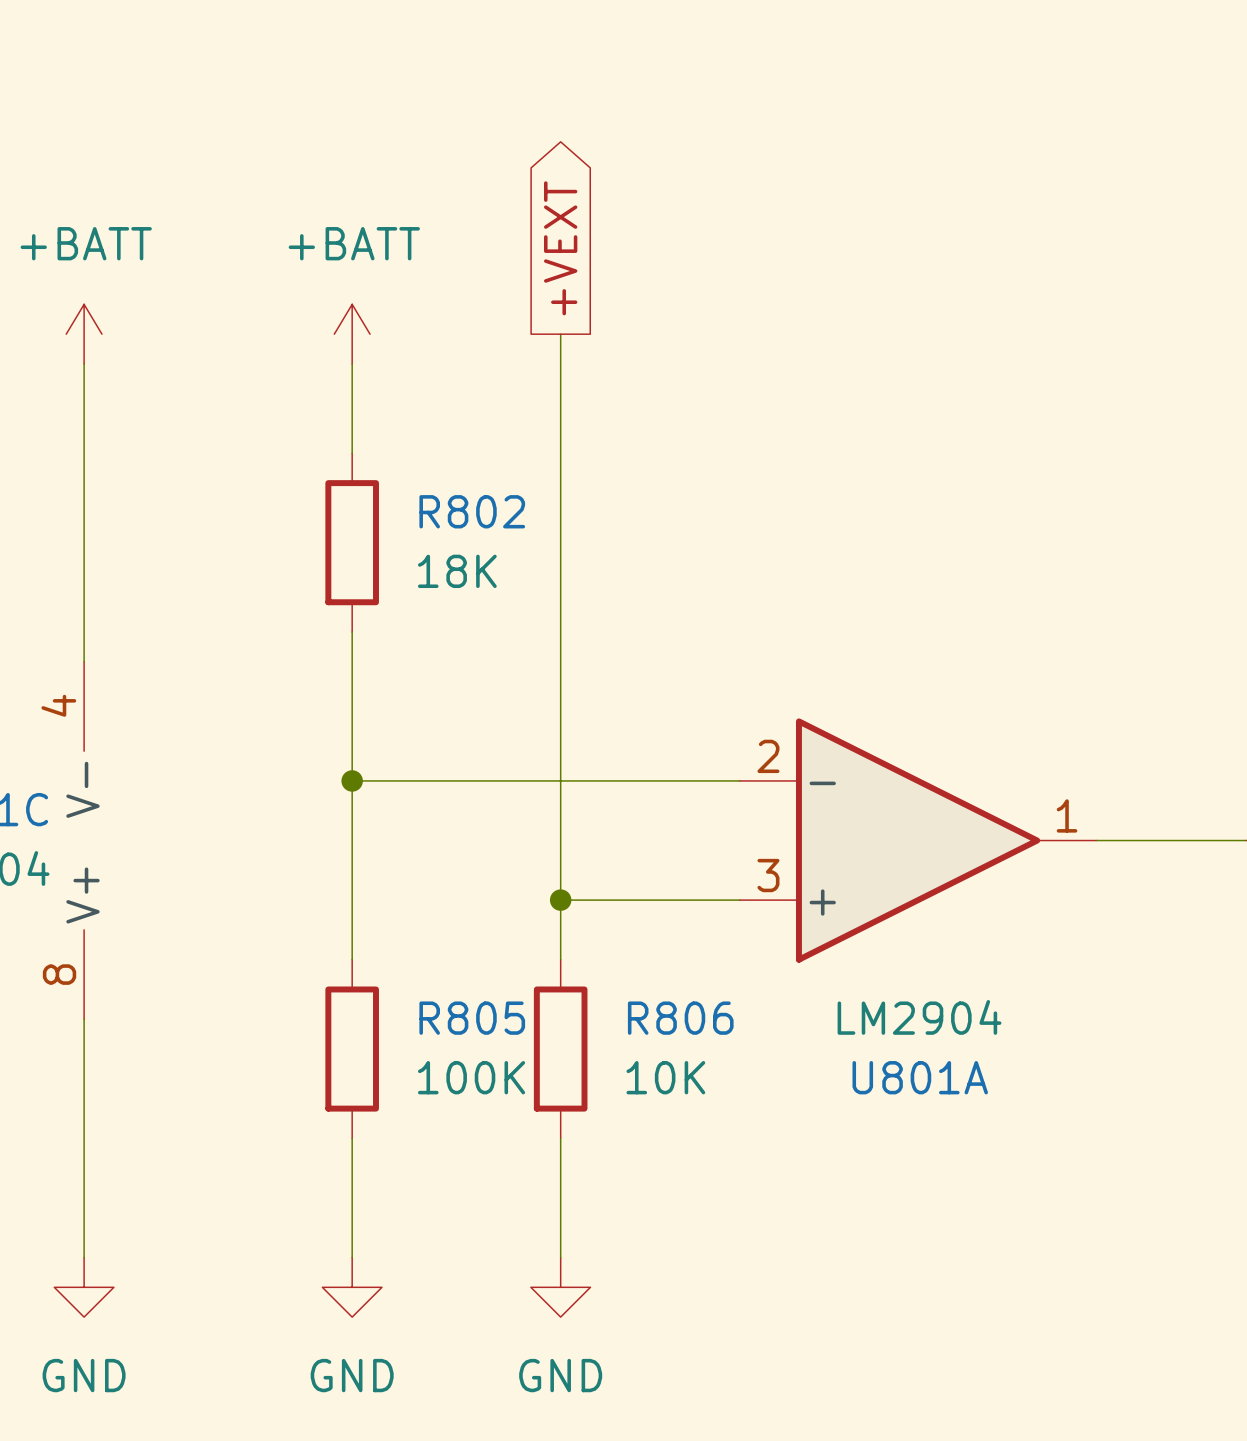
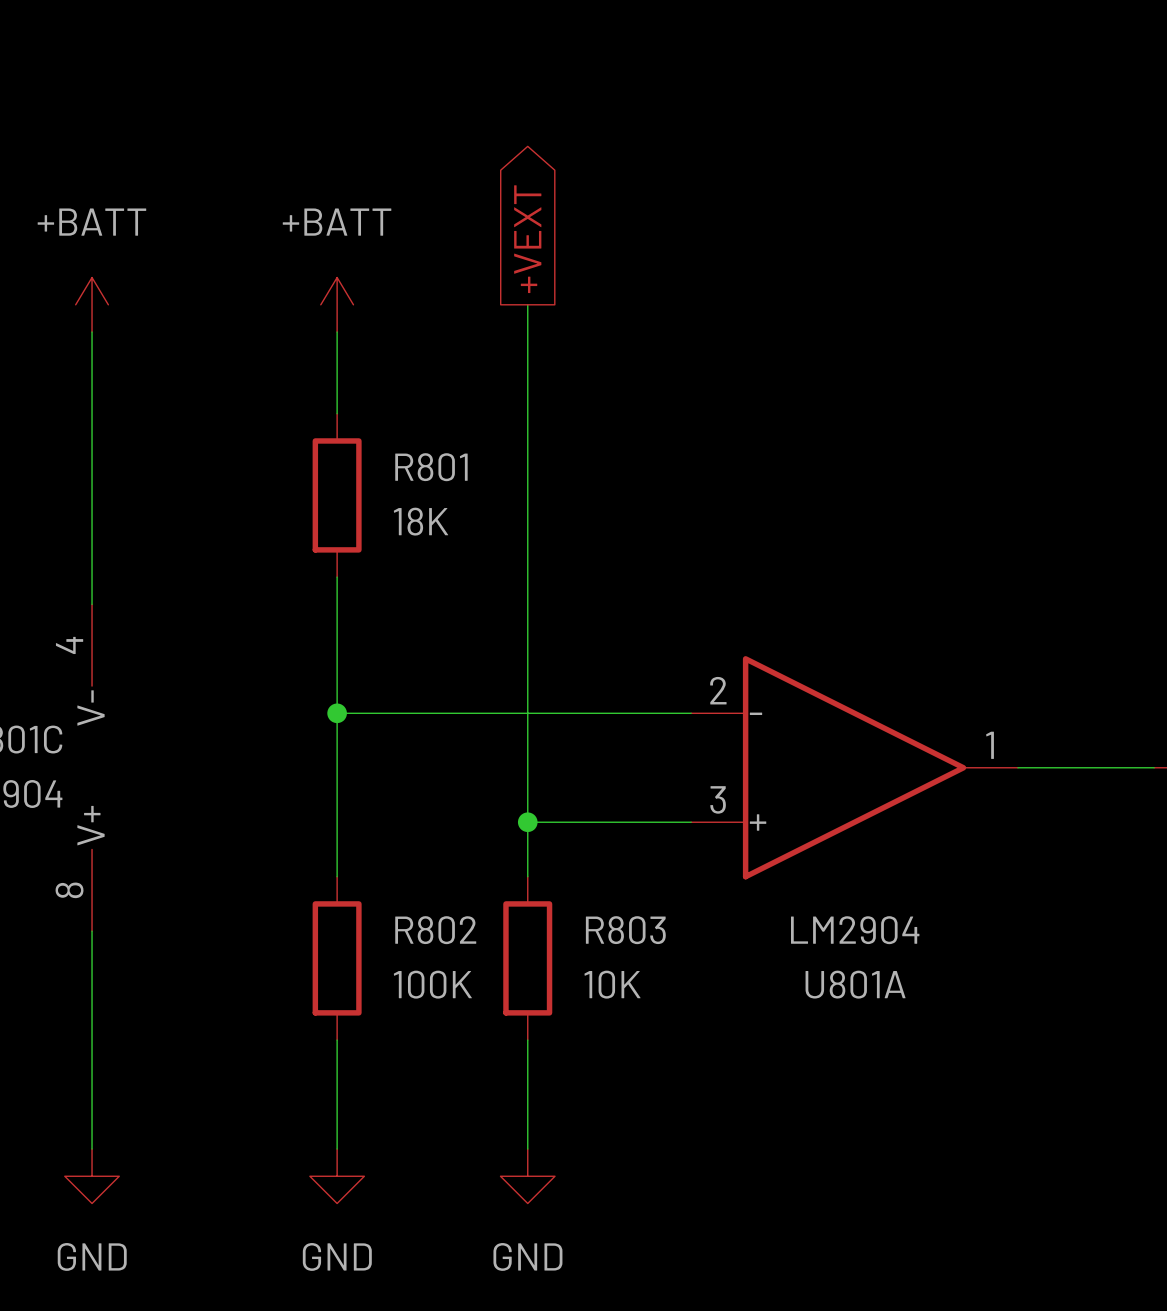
R802 name: R802 (472, 511) -> R801 (431, 467)
R805 name: R805 (472, 1018) -> R802 (435, 930)
R806 name: R806 (680, 1018) -> R803 (625, 930)

